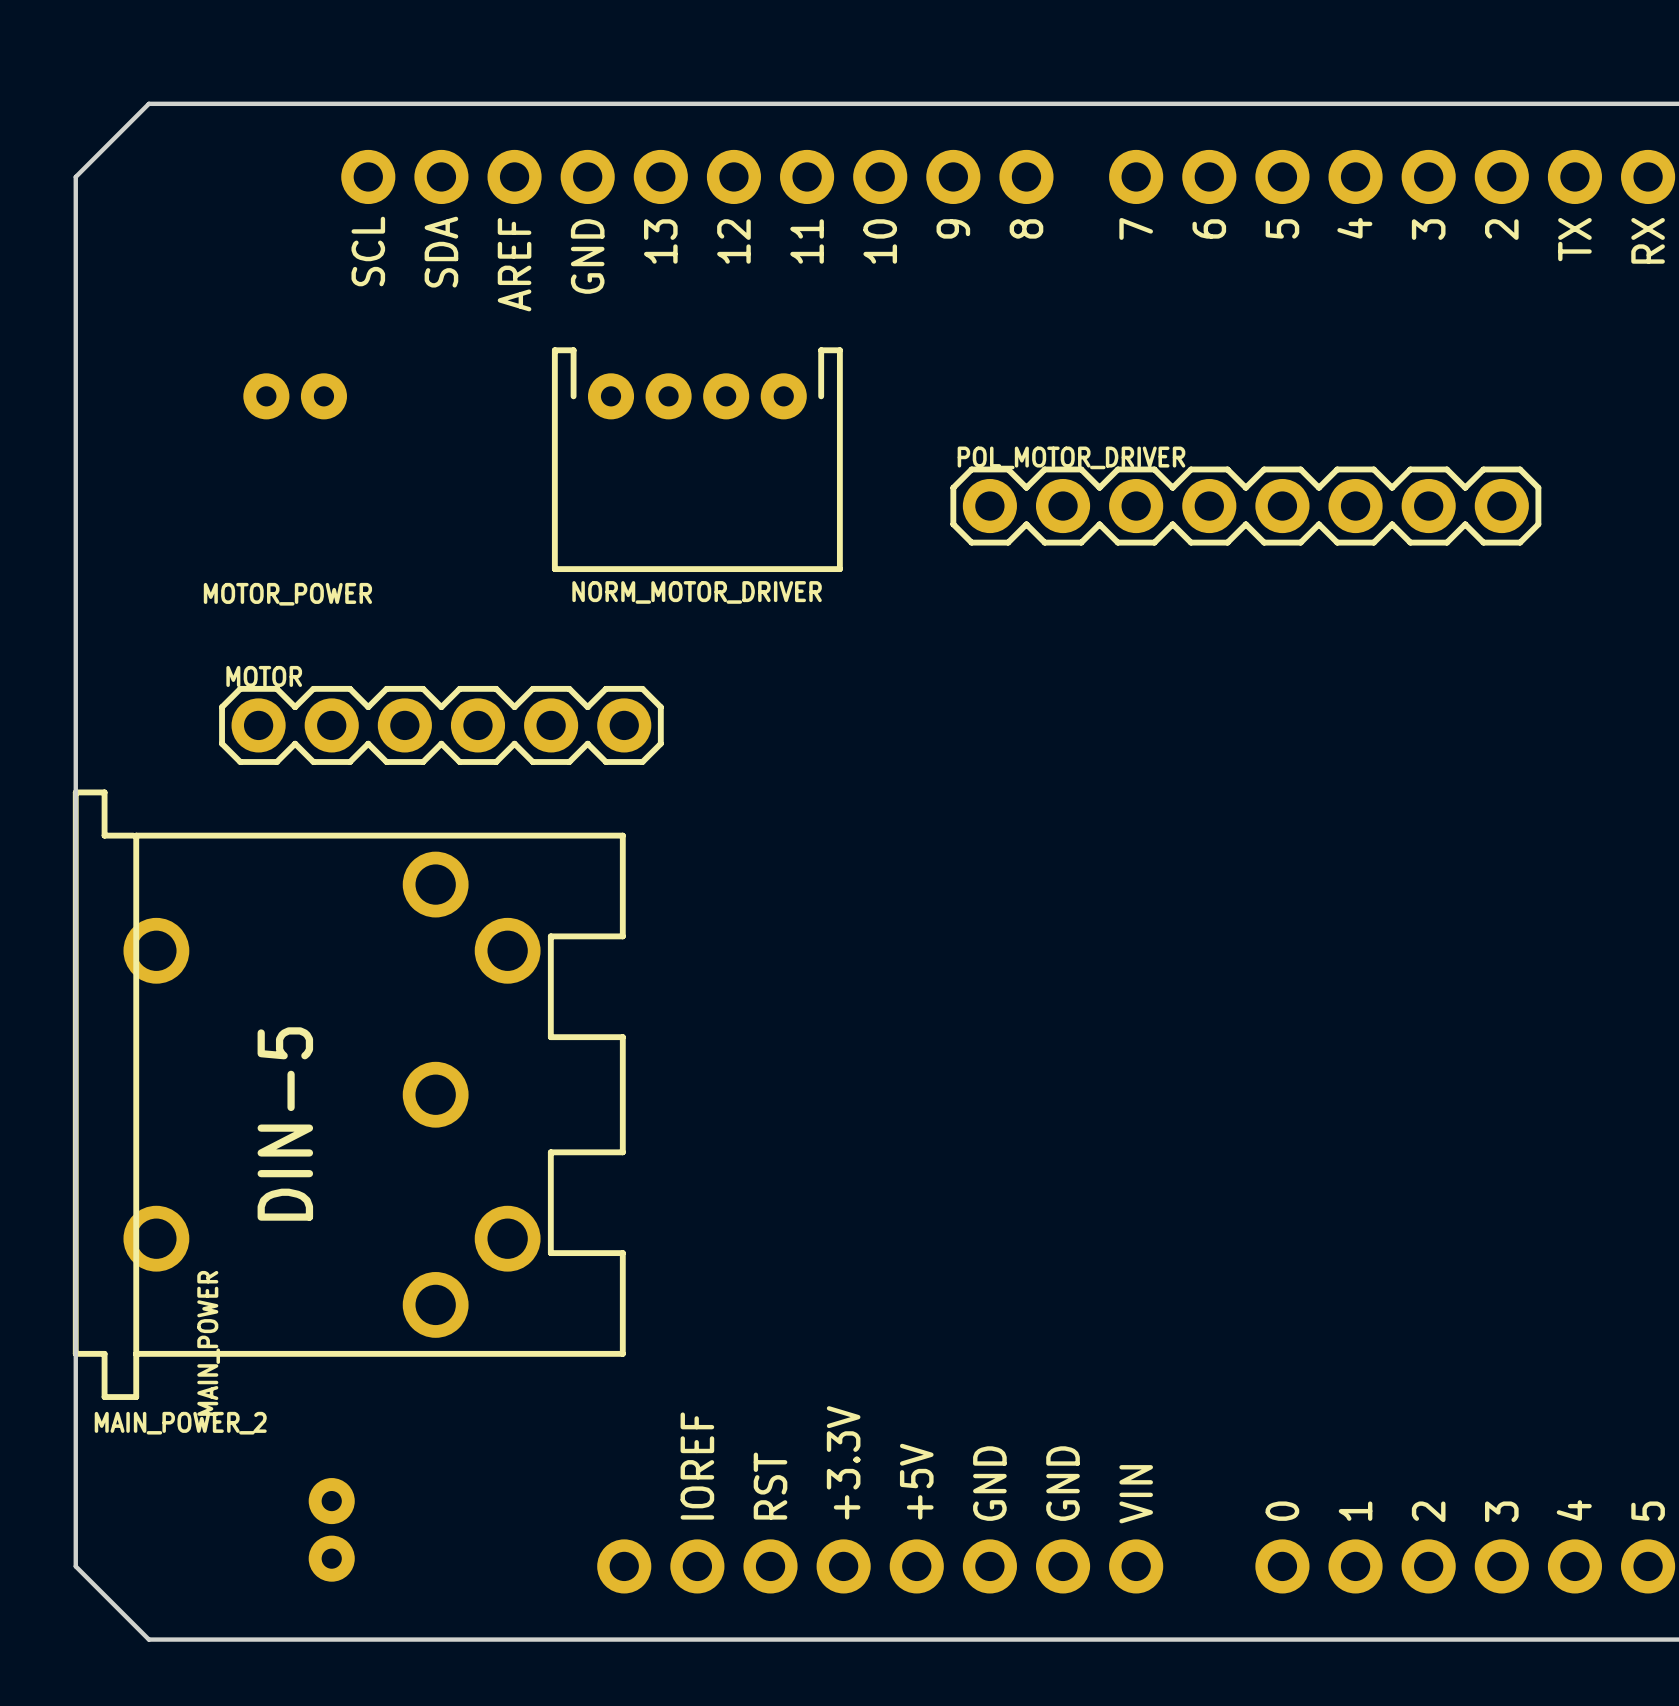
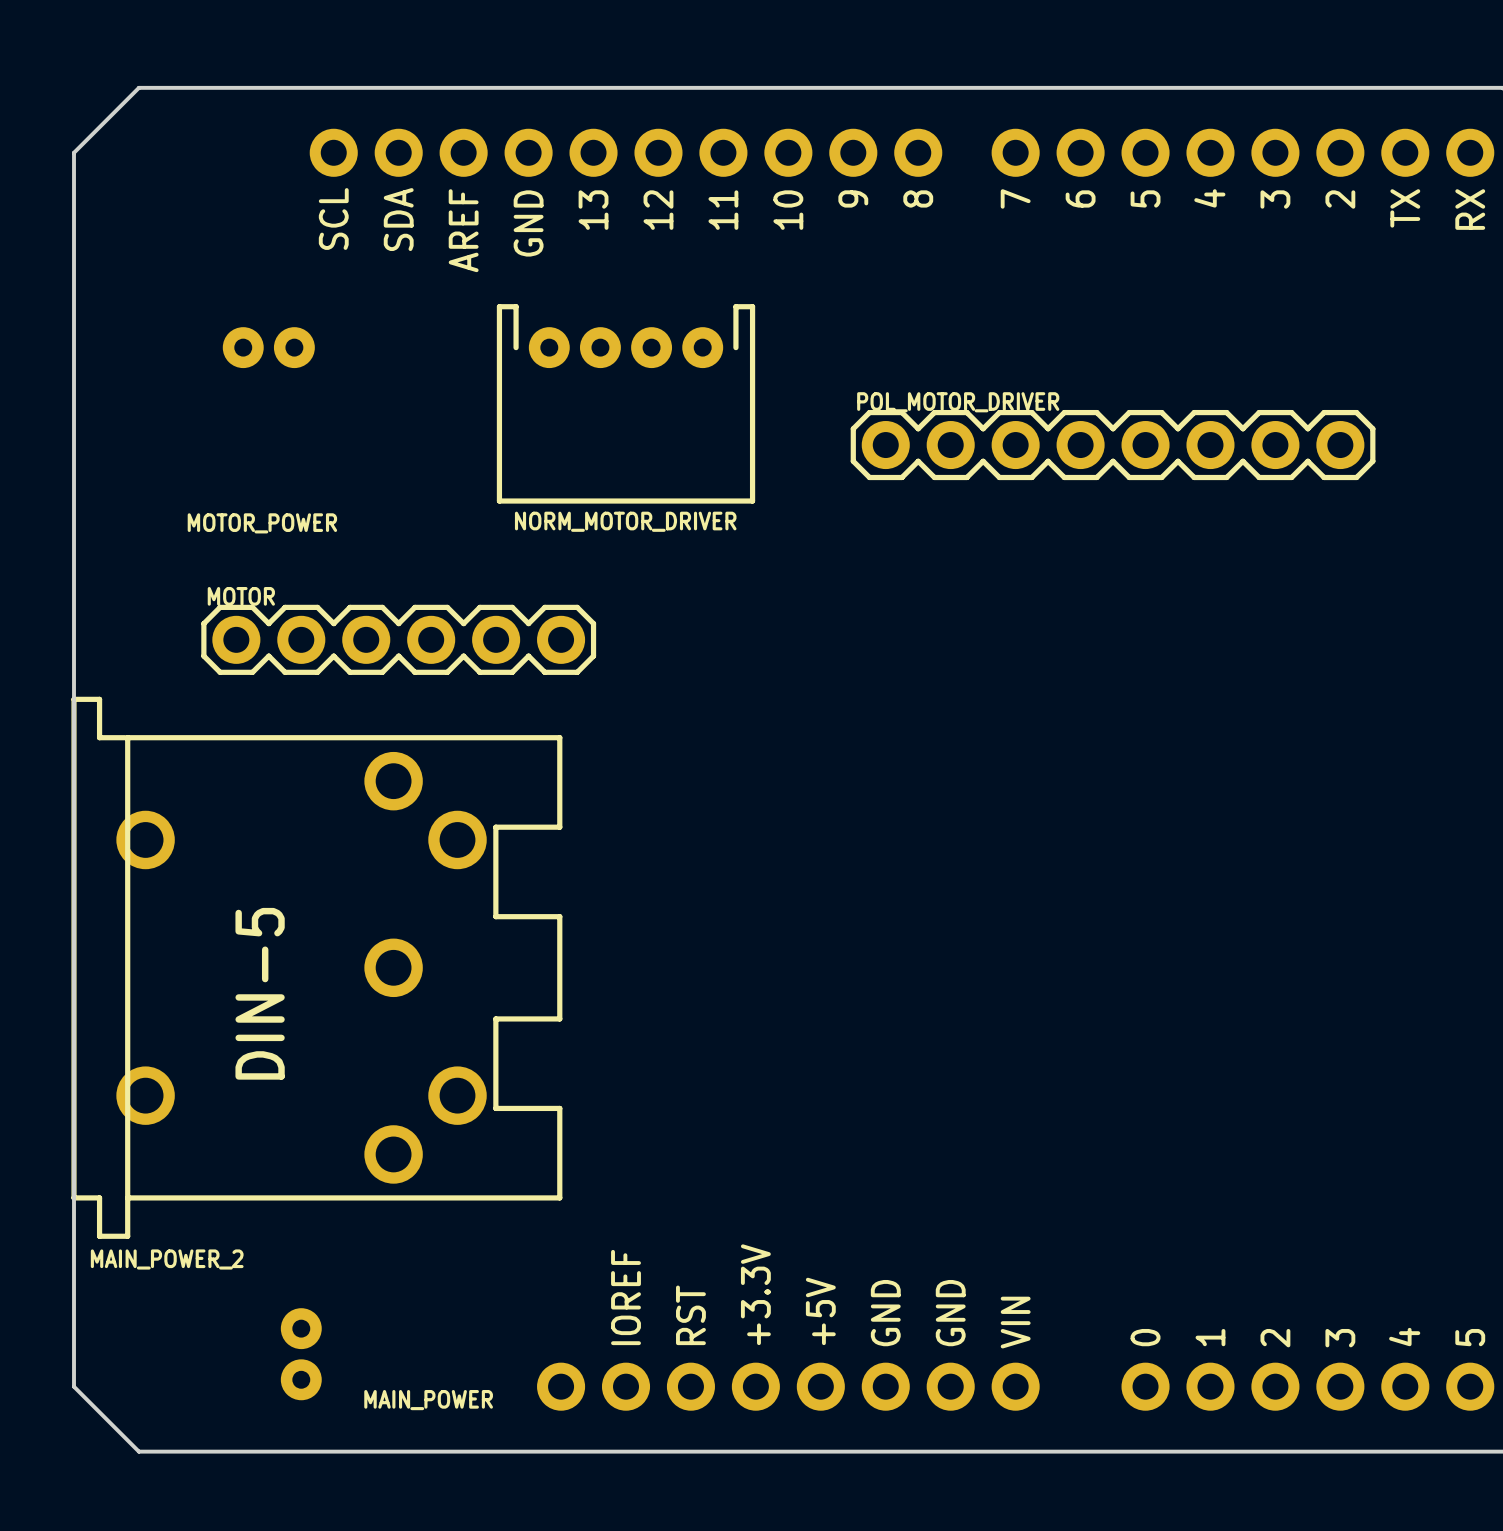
MAIN_POWER name rotation: 0° (208, 1343) -> 90° clockwise (428, 1400)
MAIN_POWER name position: MAIN_POWER (208, 1343) -> MAIN_POWER (428, 1400)

